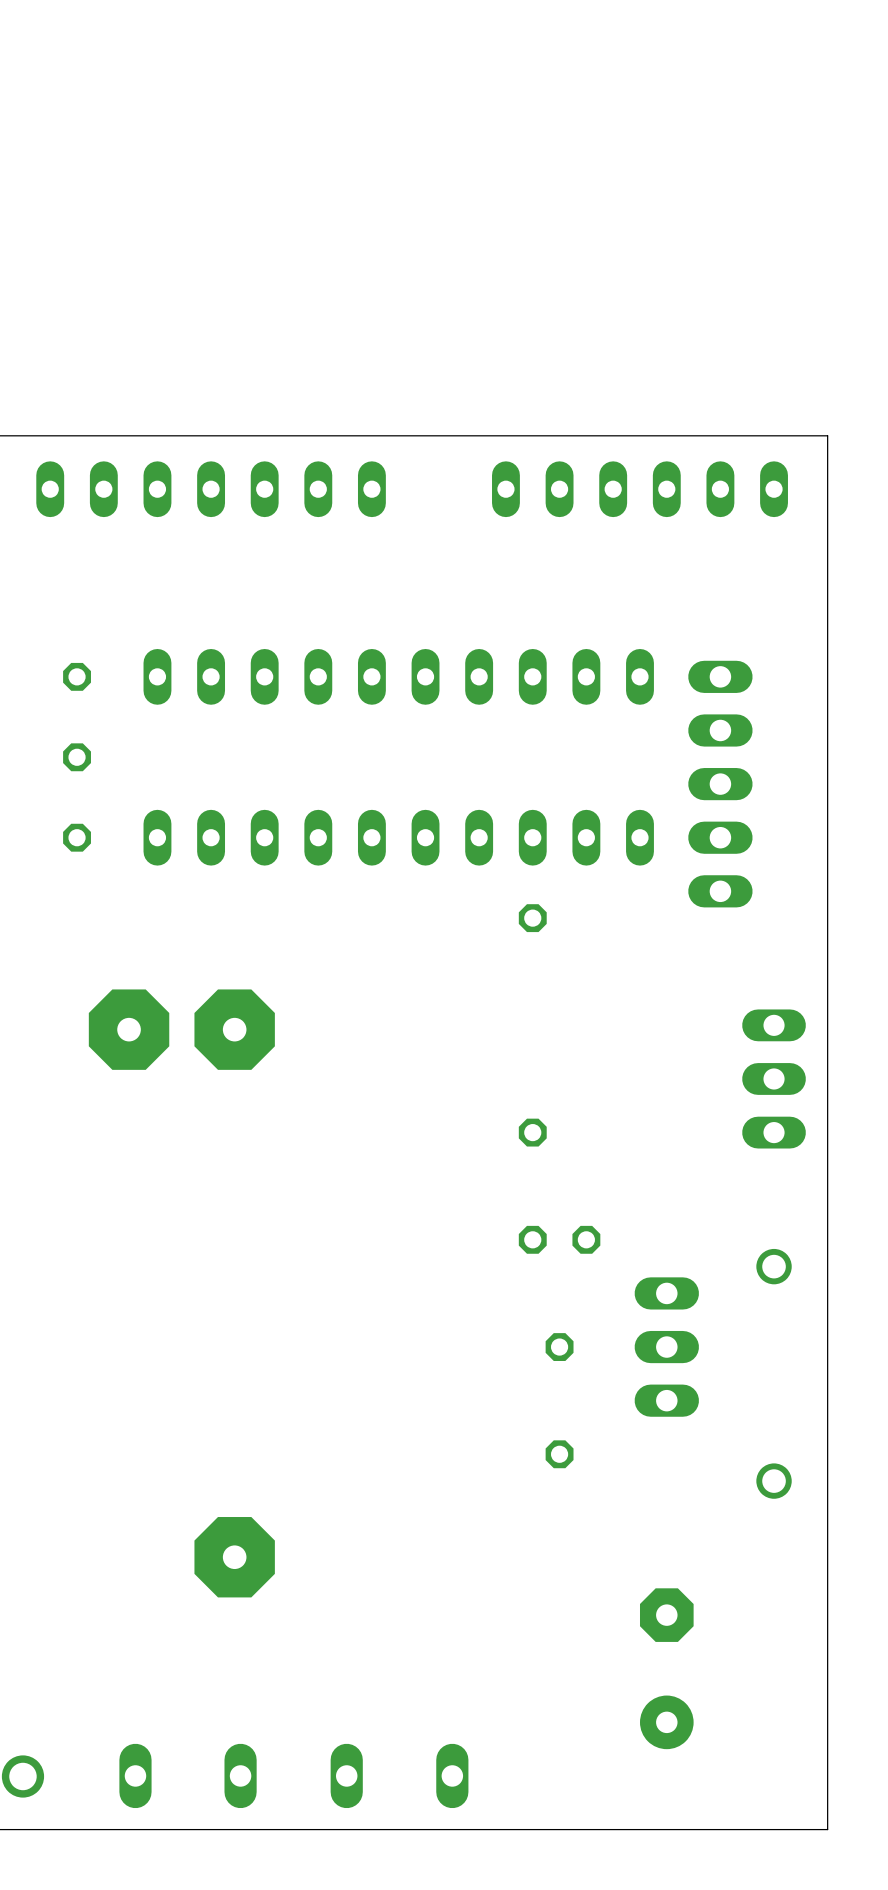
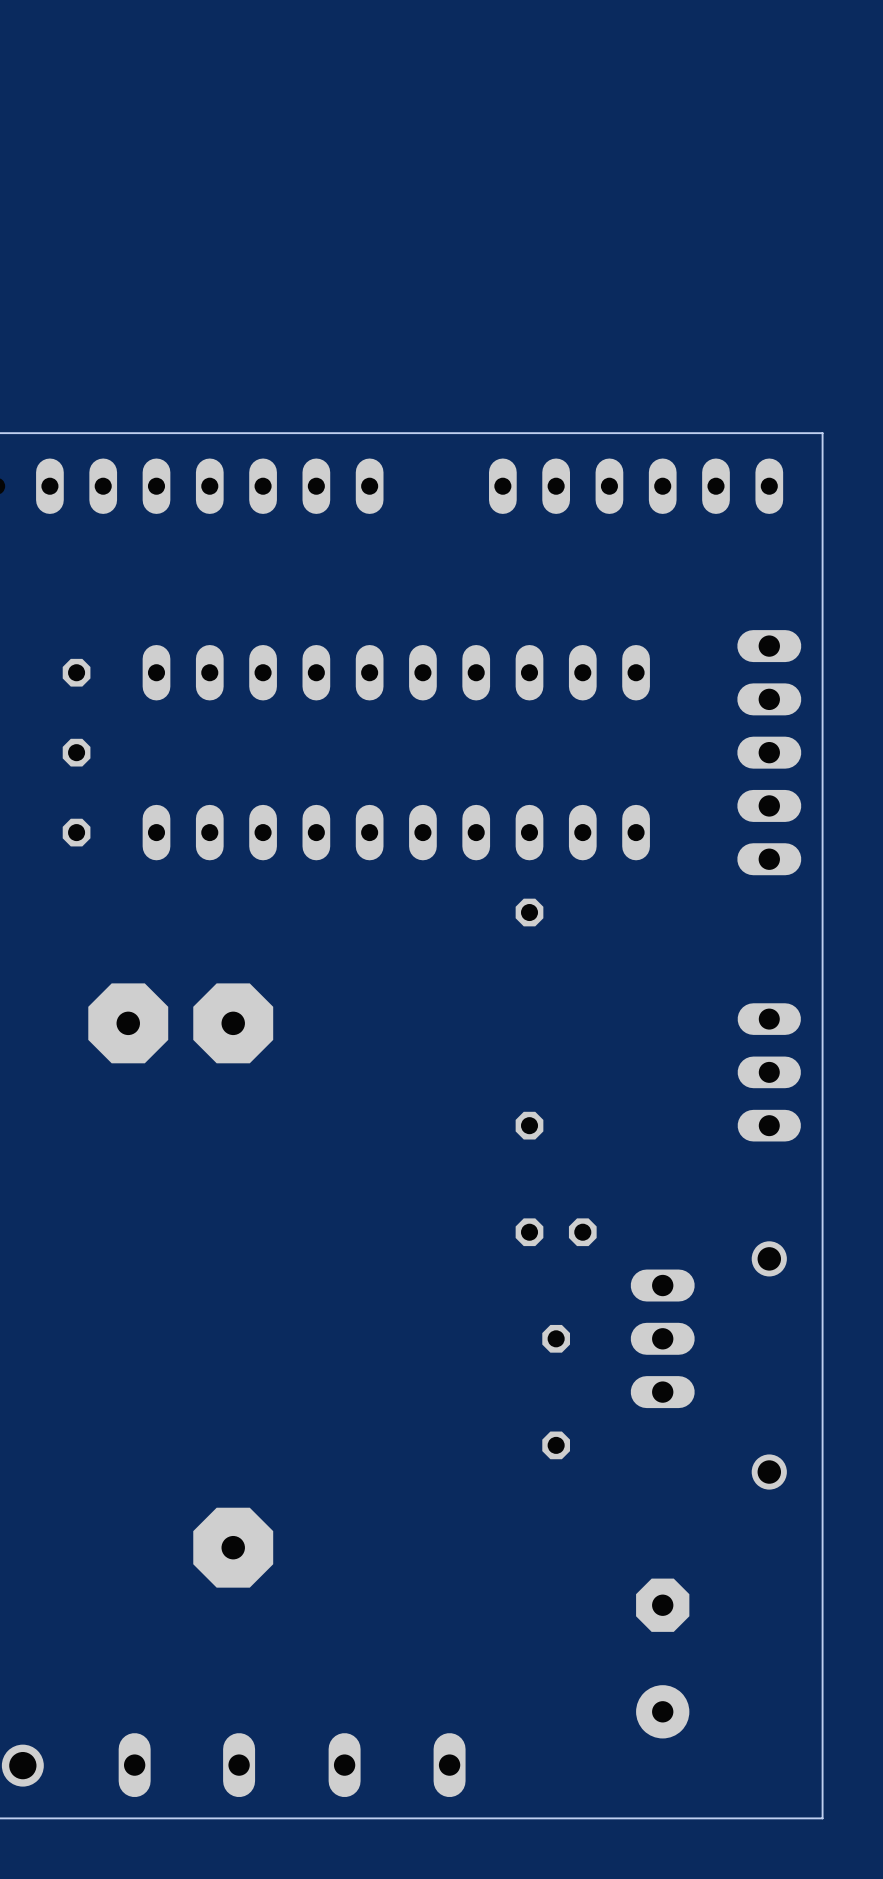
part position: (720, 784) -> (769, 752)

